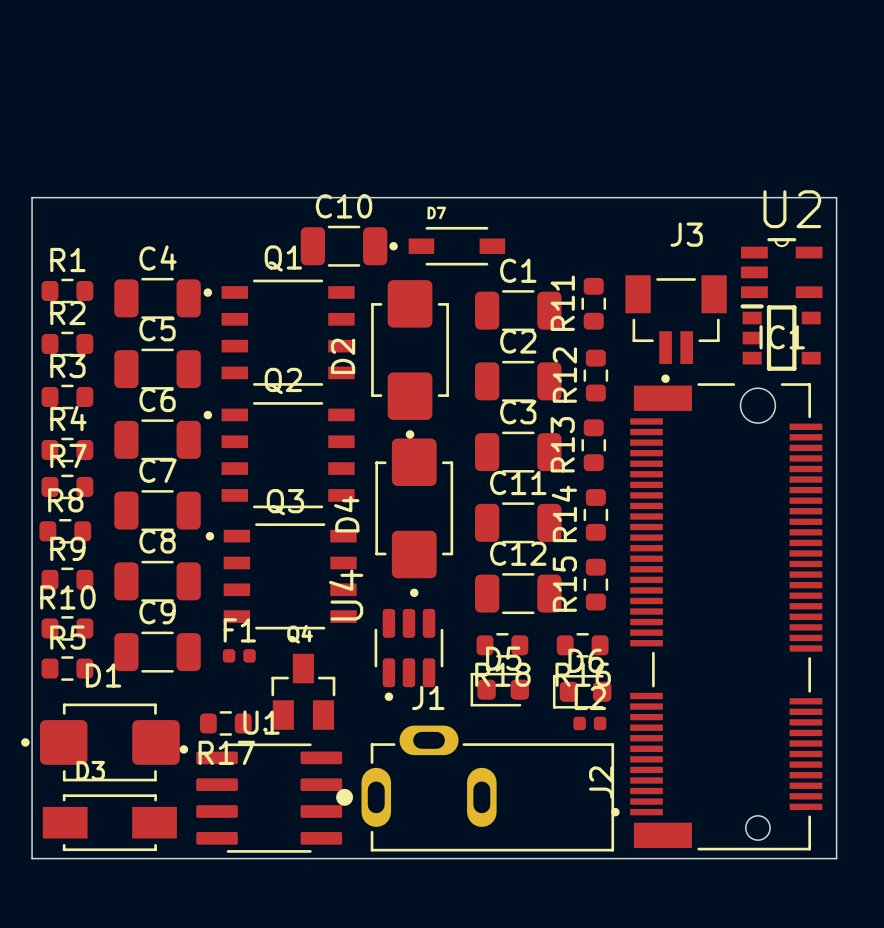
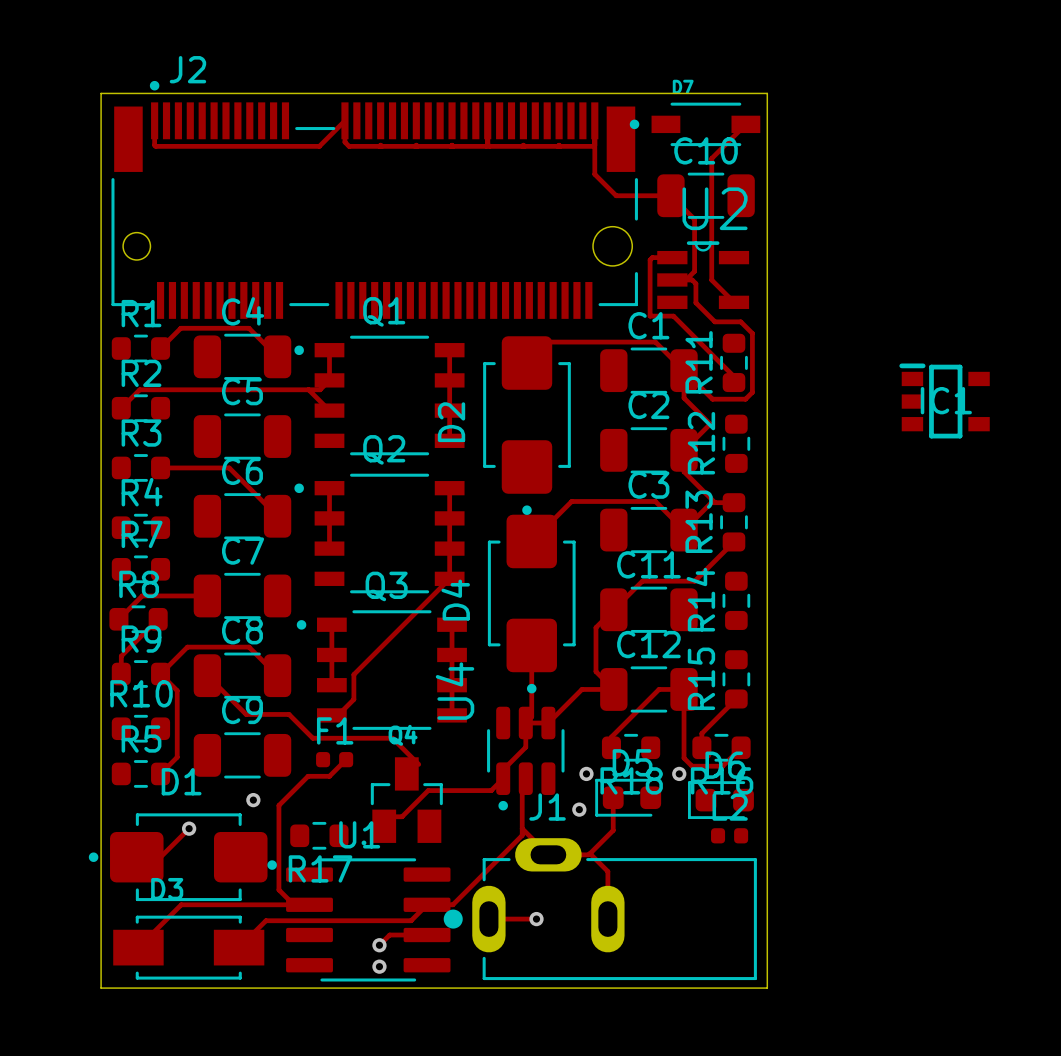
top track: none -> (154, 120) (155, 146) (319, 146) (344, 120) (344, 142) (349, 146) (486, 146) (487, 120)
top track: none -> (594, 120) (594, 174) (616, 195) (670, 195) (694, 219) (694, 271) (686, 279)
top track: none -> (745, 124) (711, 158) (711, 280) (733, 302)
top track: none -> (487, 144) (489, 146) (594, 145)
board edge: (32, 197) (836, 197) (836, 858) (623, 858) -> (101, 243) (101, 93) (767, 93) (767, 988)
top track: none -> (672, 257) (652, 257) (650, 259) (650, 316) (673, 316) (733, 376) (733, 382)
top track: none -> (672, 279) (692, 279) (695, 283) (695, 302) (714, 321) (740, 321) (752, 333) (752, 392) (745, 399) (712, 399) (655, 342) (547, 342) (526, 363)
C10 position: (344, 246) -> (706, 195)
D7 position: (447, 246) -> (695, 124)
U2 position: (781, 268) -> (703, 275)
top track: none -> (160, 348) (180, 328) (249, 328) (277, 356)
top track: none -> (329, 350) (329, 380) (320, 389) (139, 389) (121, 408)
top track: none -> (449, 350) (449, 440)
top track: none -> (684, 370) (684, 397) (710, 424) (684, 450) (684, 471) (714, 502)
top track: none -> (308, 389) (329, 410)
J3: (676, 329) -> none
top track: none -> (160, 467) (229, 467) (277, 516)
top track: none -> (329, 488) (329, 548)
top track: none -> (449, 488) (449, 578) (353, 674) (353, 699) (337, 715) (331, 715)
top track: none -> (733, 502) (711, 502) (684, 530) (655, 501) (571, 501) (531, 541)
top track: none -> (733, 541) (694, 581) (642, 581) (595, 627) (595, 671) (613, 689) (581, 689) (548, 723) (525, 723)
top track: none -> (207, 595) (142, 595) (118, 619)
top track: none -> (158, 619) (121, 656) (121, 674)
top track: none -> (331, 624) (331, 685)
top track: none -> (452, 624) (452, 715)
top track: none -> (531, 645) (531, 716) (525, 722) (525, 747) (503, 769) (503, 778) (491, 790) (428, 790) (402, 816) (396, 816)
top track: none -> (207, 675) (246, 714) (289, 714) (312, 738) (392, 738) (418, 764)
top track: none -> (277, 675) (249, 647) (187, 647) (160, 674) (177, 690) (177, 757) (160, 773)
top track: none -> (736, 698) (701, 733) (701, 747)
J2 rotation: 0° (716, 616) -> 90° clockwise (374, 199)
J2 position: (716, 616) -> (374, 199)
top track: none -> (611, 747) (611, 737) (659, 689) (684, 689) (684, 758) (692, 766) (722, 766) (741, 747)
top track: none -> (346, 759) (329, 776) (308, 776) (278, 805) (278, 889) (293, 904)
via: none -> (586, 773)
via: none -> (679, 773)
top track: none -> (525, 778) (522, 782) (522, 835) (452, 904) (427, 904) (411, 920) (265, 920) (239, 947)
top track: none -> (613, 797) (613, 830) (588, 854) (548, 854) (522, 828)
via: none -> (253, 800)
via: none -> (579, 809)
top track: none -> (189, 828) (160, 857) (136, 857)
via: none -> (189, 828)
top track: none -> (590, 853) (607, 871) (607, 919)
top track: none -> (309, 904) (181, 904) (138, 947)
top track: none -> (488, 919) (536, 919)
via: none -> (536, 919)
top track: none -> (427, 935) (389, 935) (379, 945)
via: none -> (379, 945)
via: none -> (379, 966)

